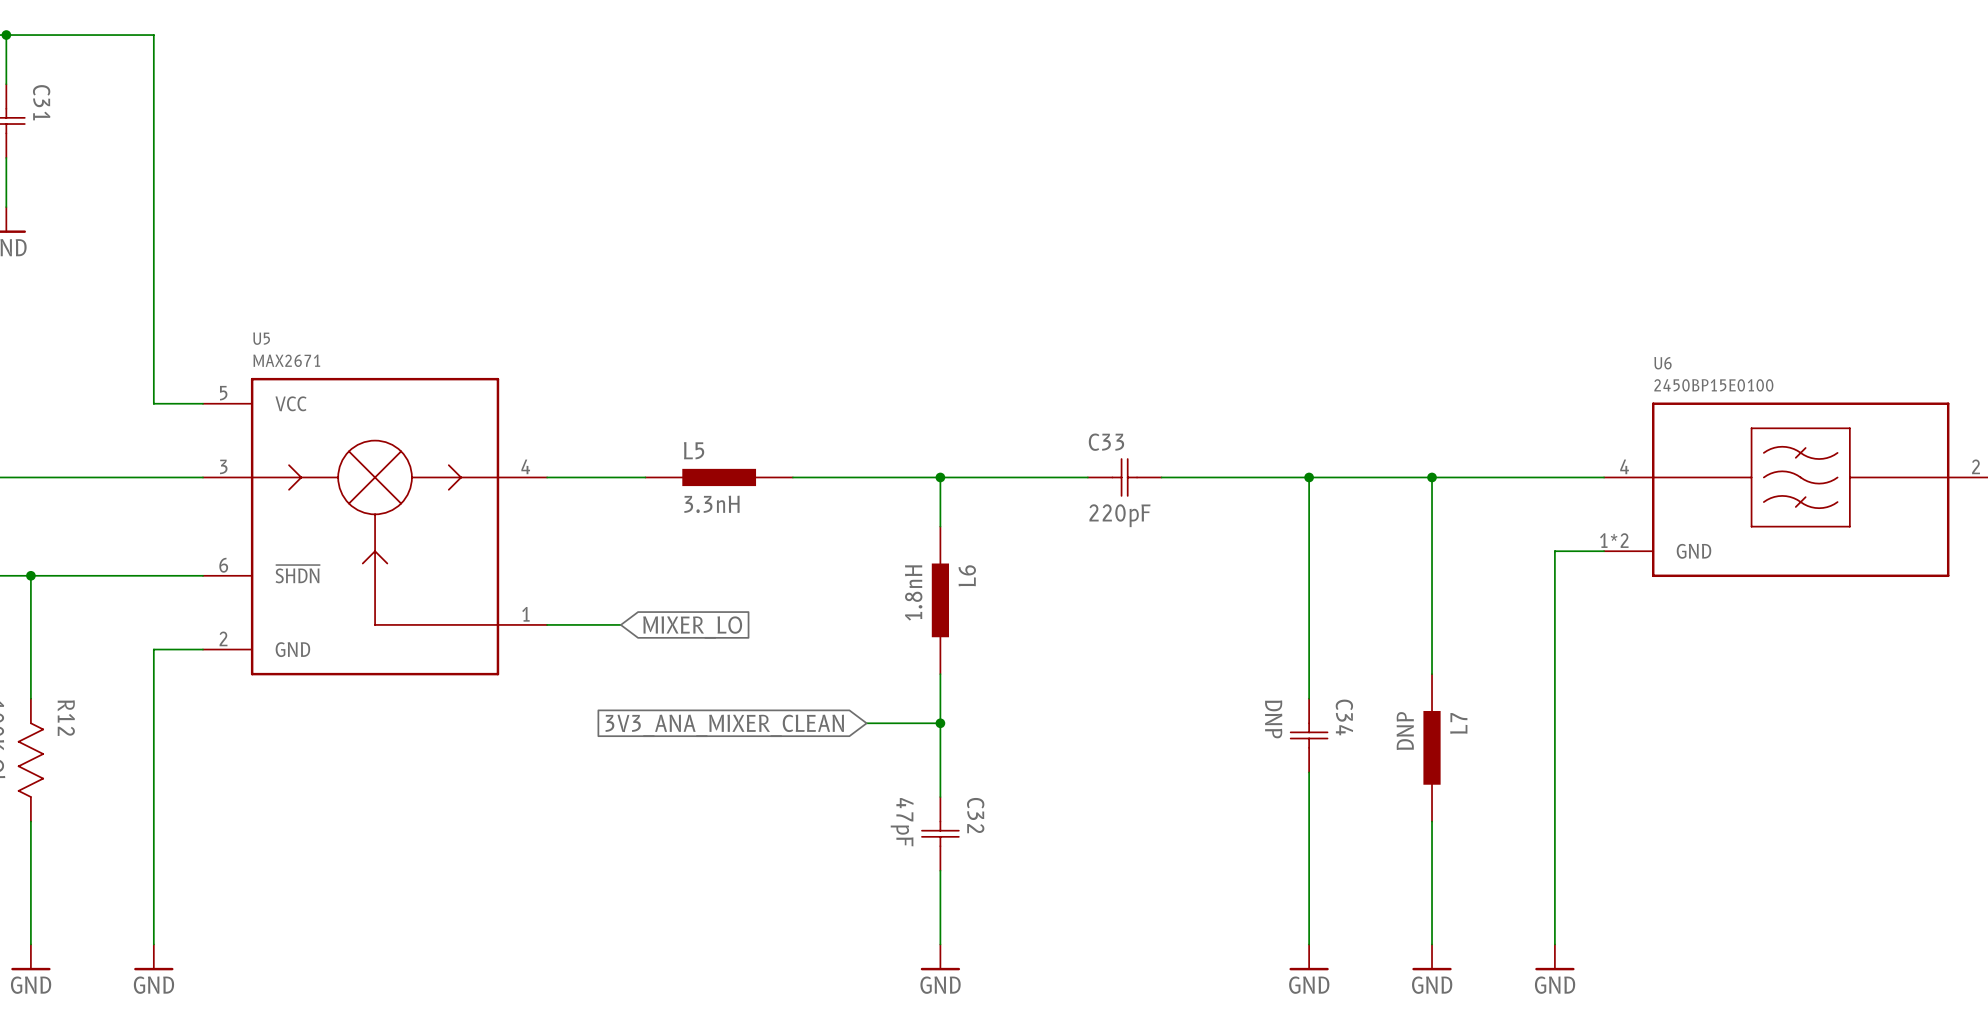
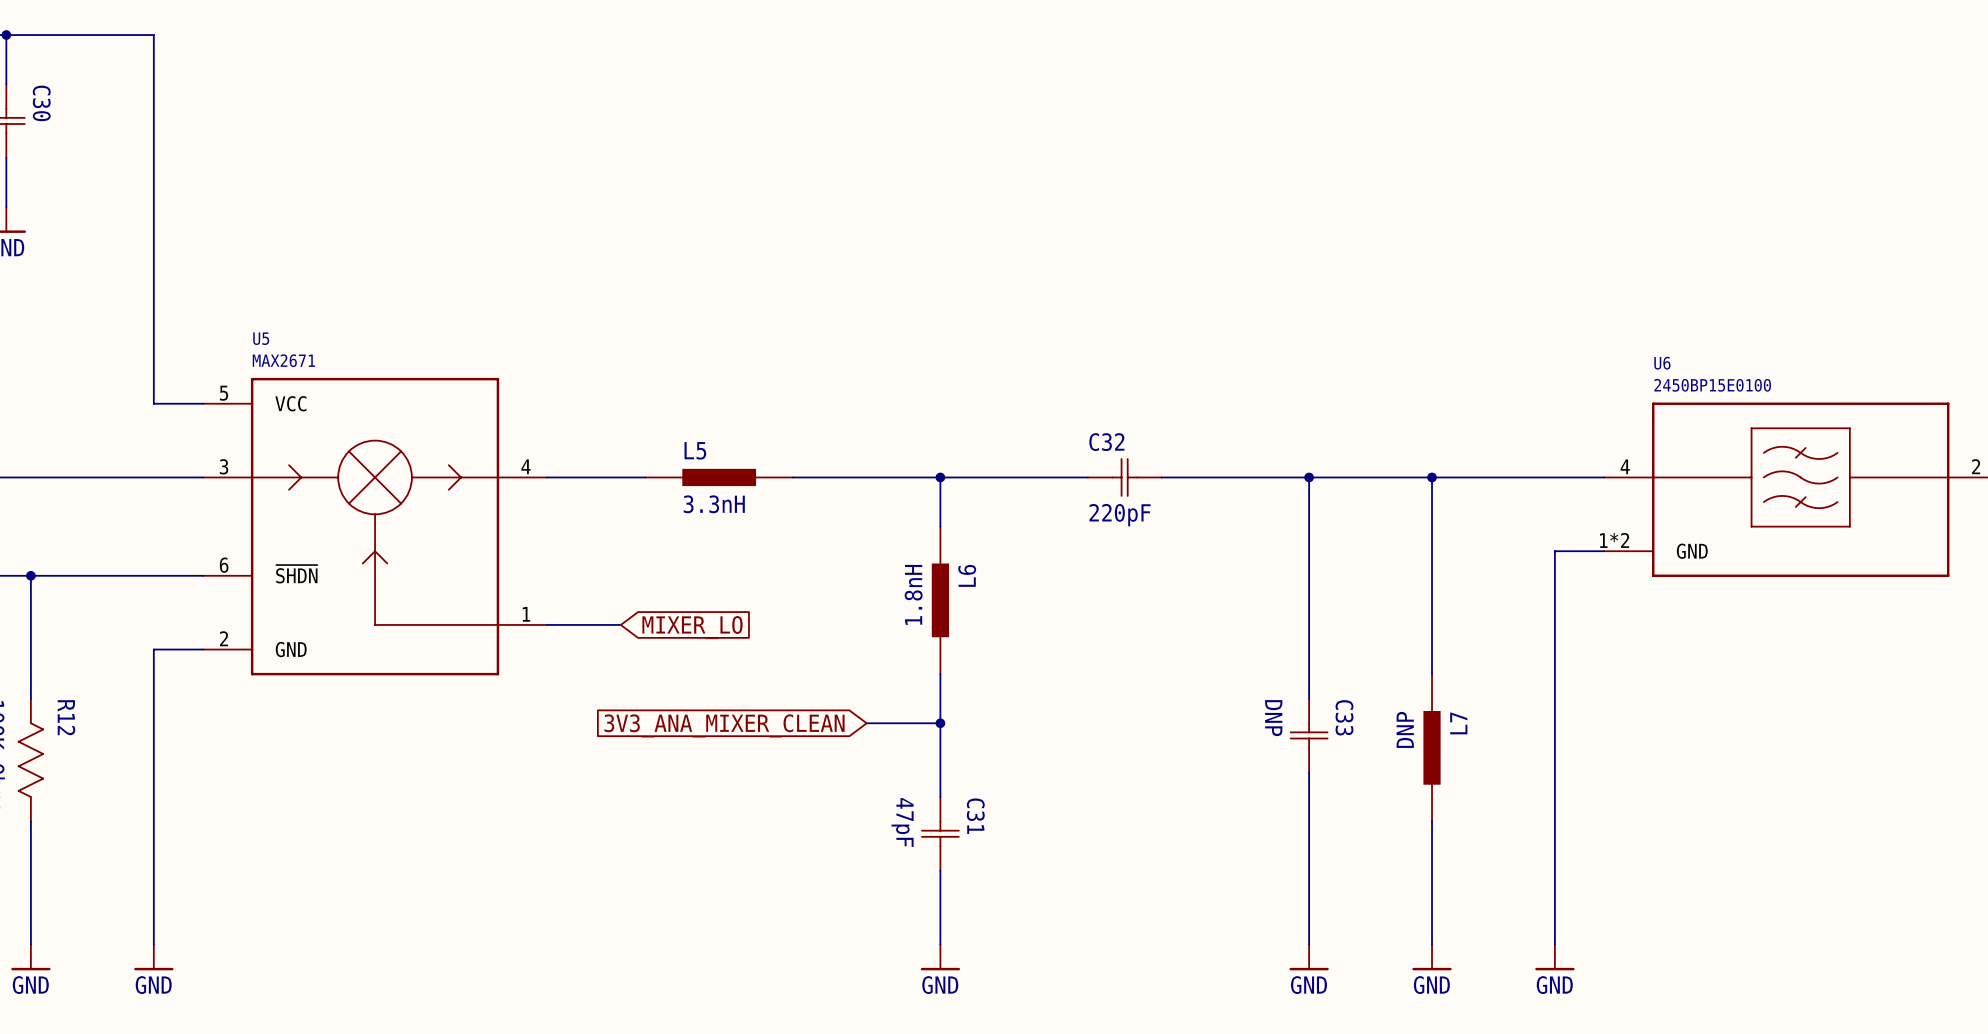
C31 name: C31 (41, 102) -> C30 (41, 103)
C33 name: C33 (1106, 442) -> C32 (1106, 442)
C34 name: C34 (1344, 717) -> C33 (1344, 717)
C32 name: C32 (975, 815) -> C31 (975, 816)

